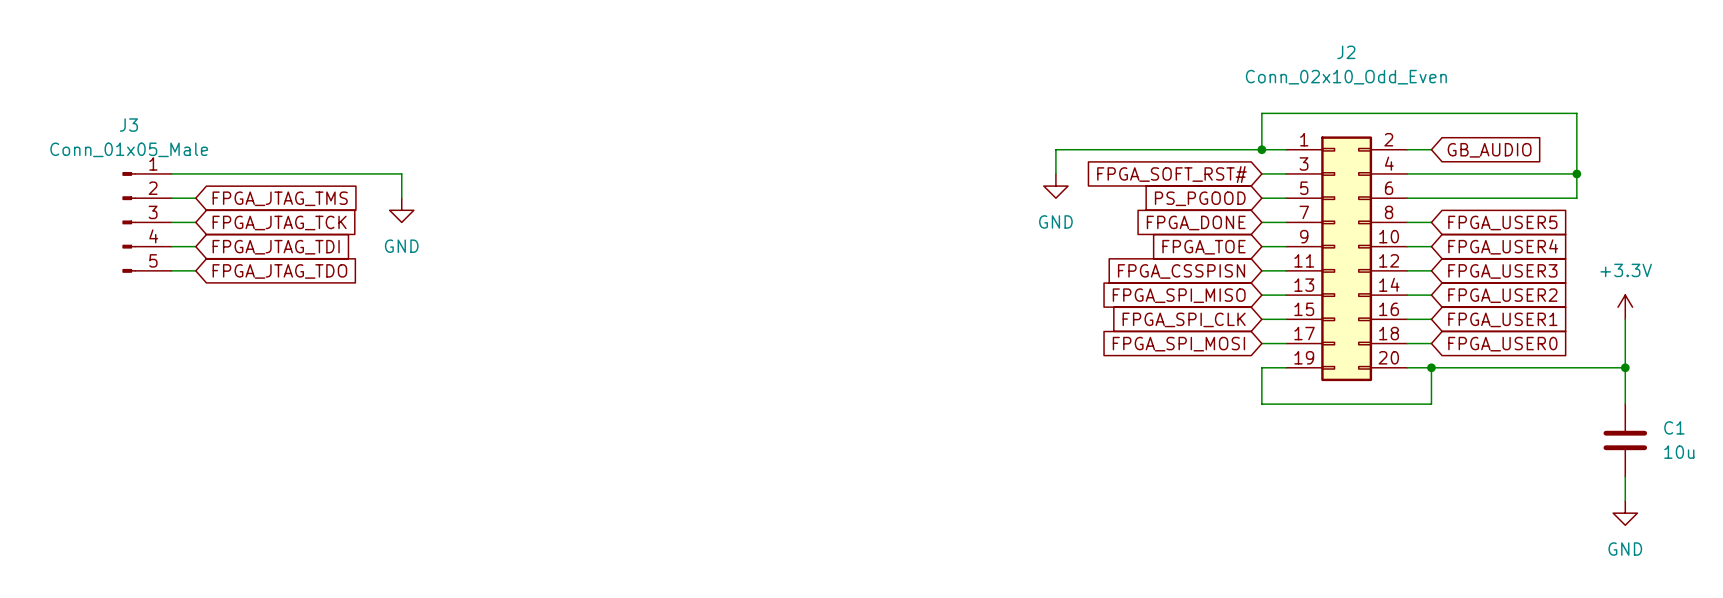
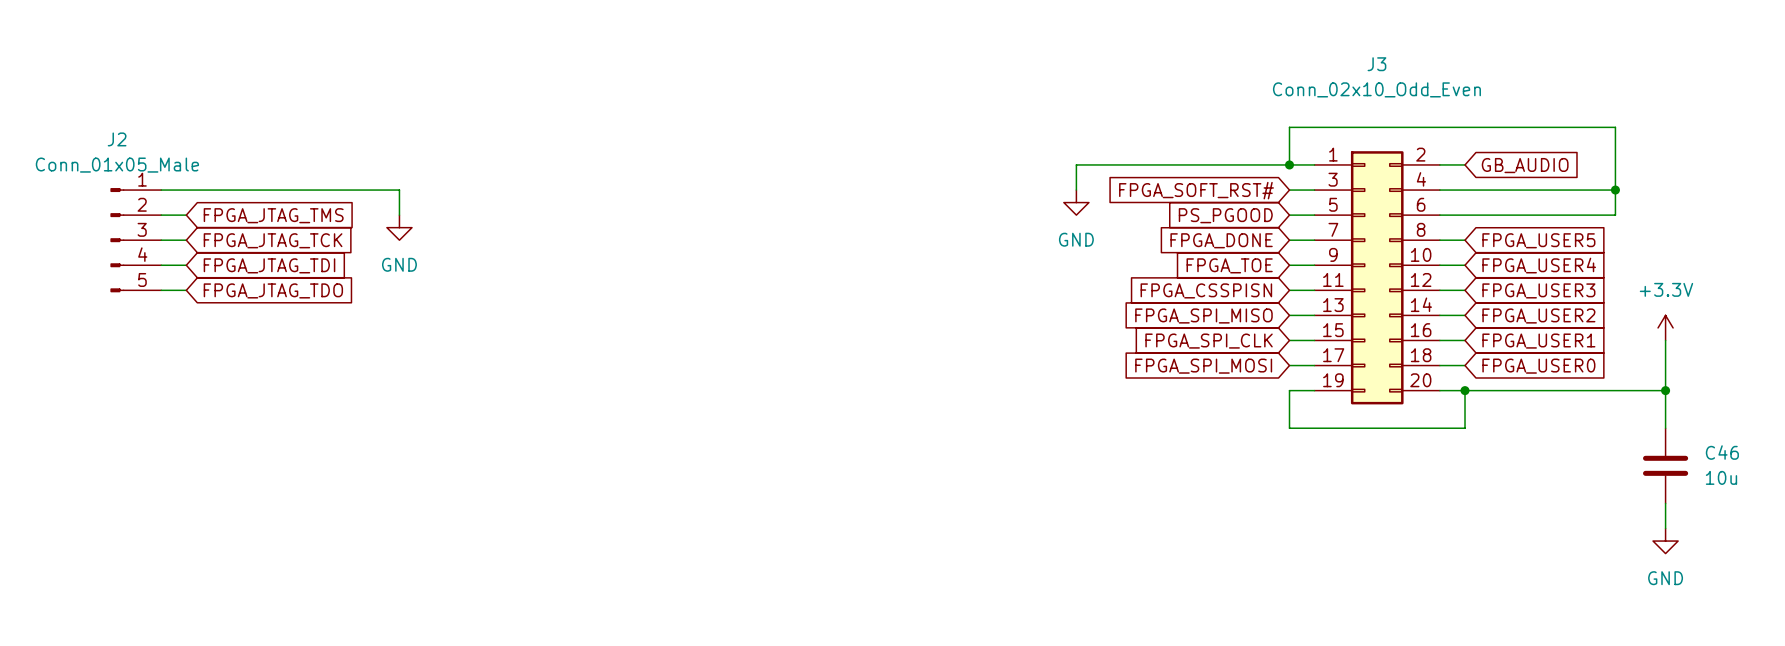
J2 name: J2 (1346, 52) -> J3 (1376, 64)
J3 name: J3 (128, 125) -> J2 (117, 139)
C1 name: C1 (1674, 427) -> C46 (1722, 452)

